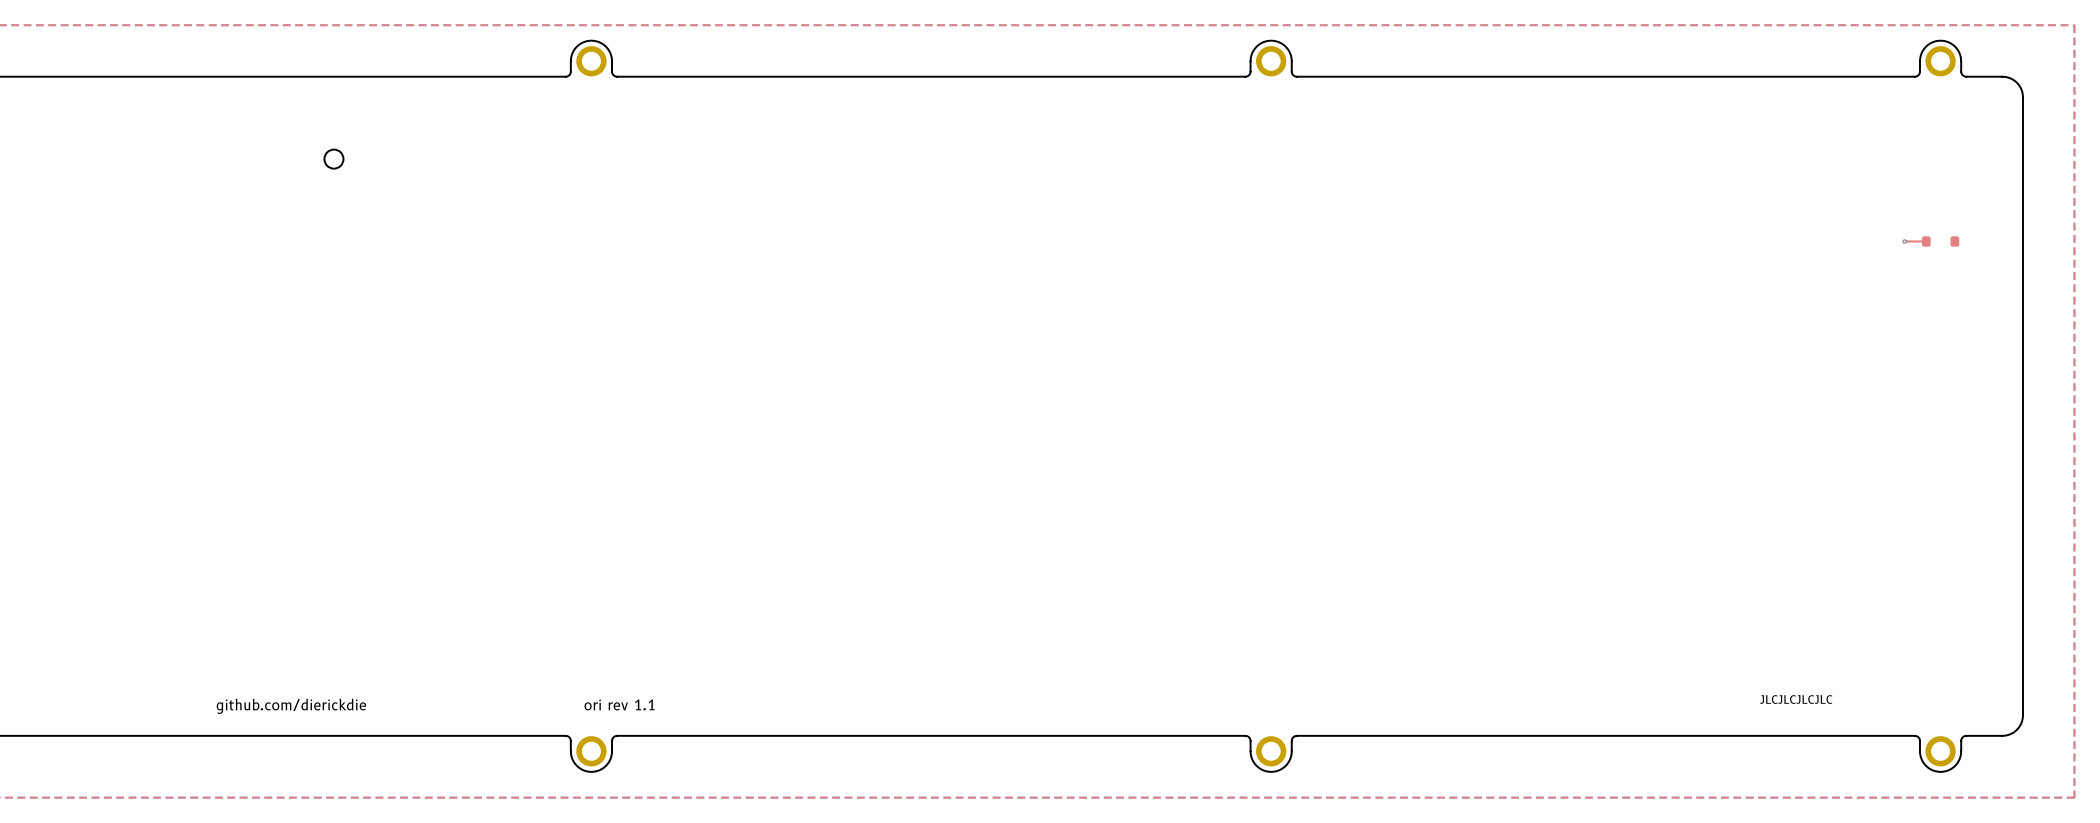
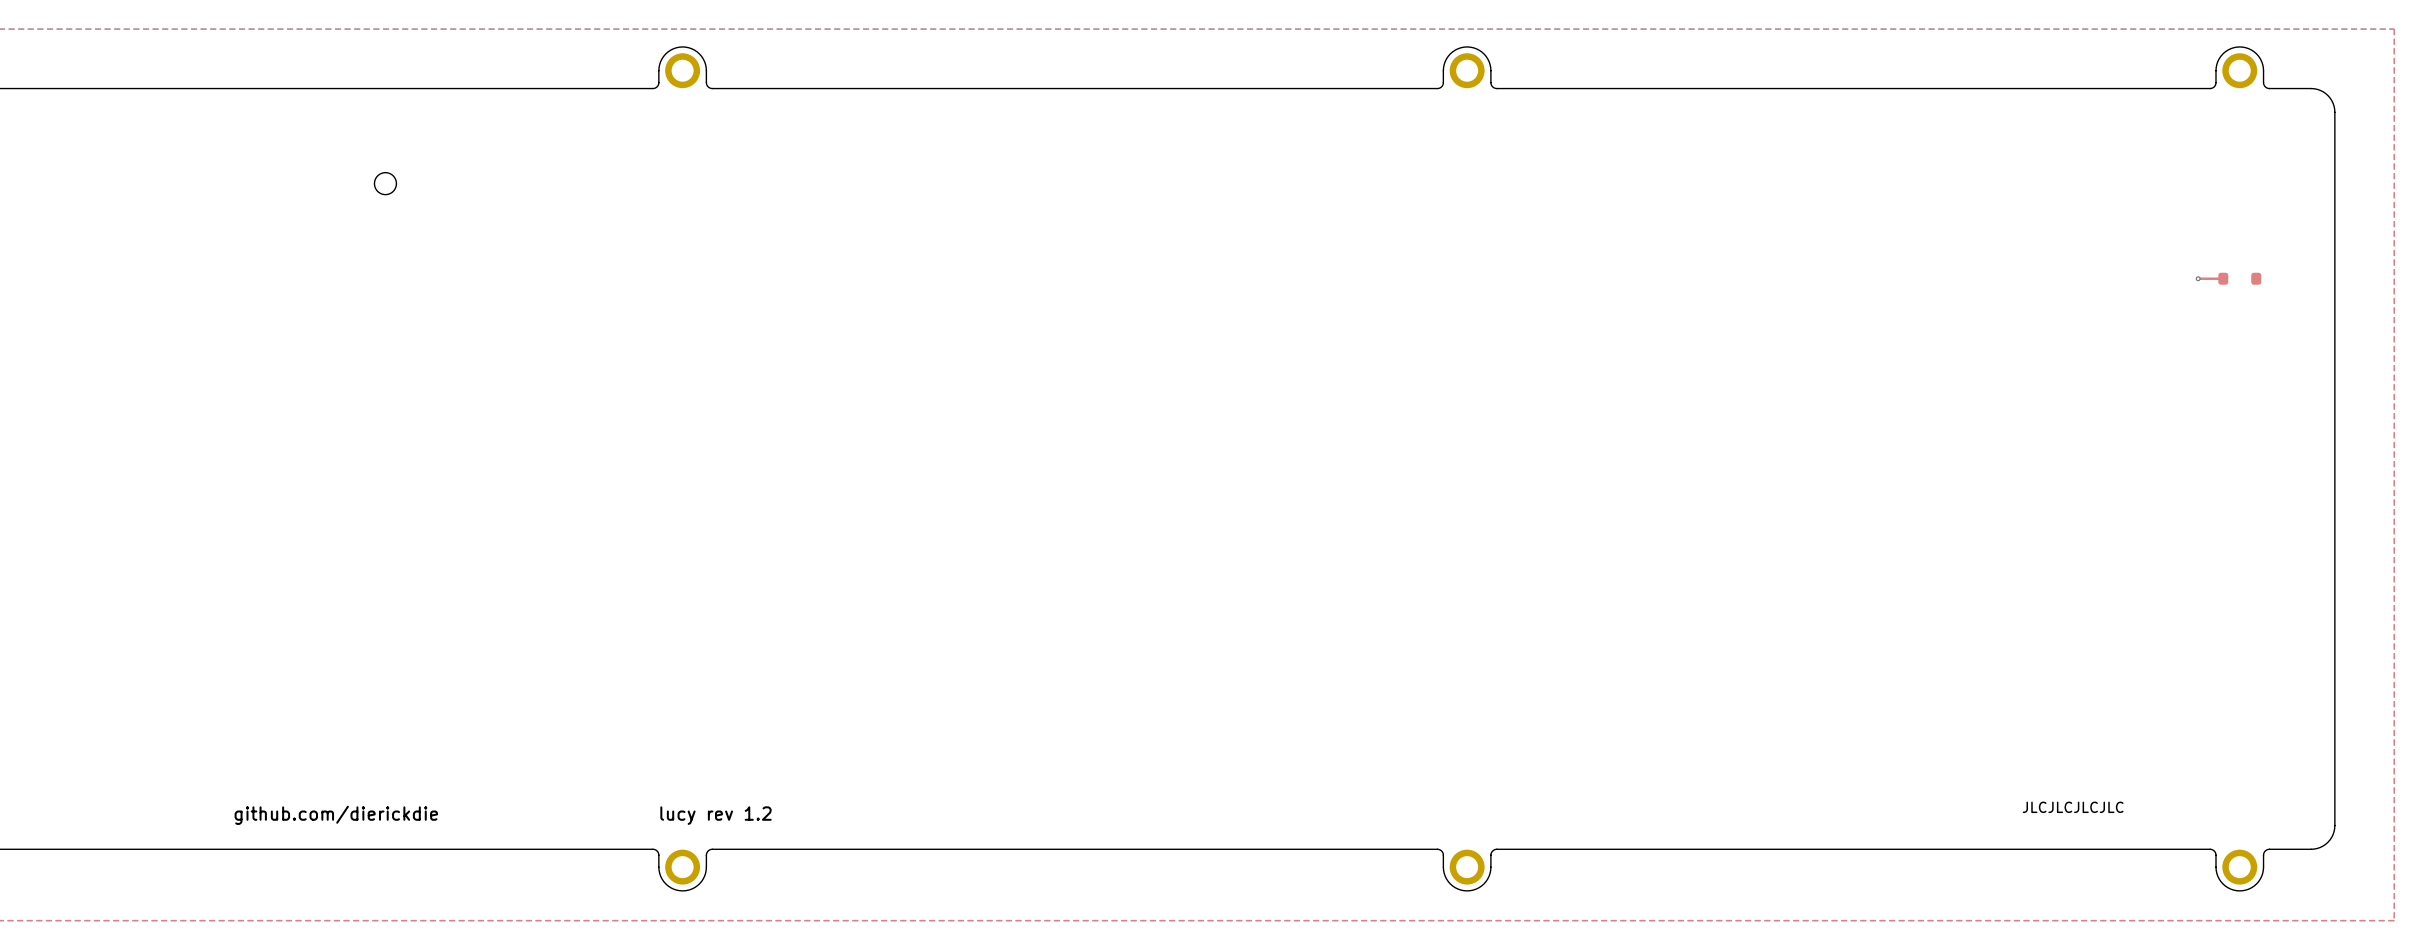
text: ori rev 1.1 (619, 704) -> lucy rev 1.2 (715, 815)

